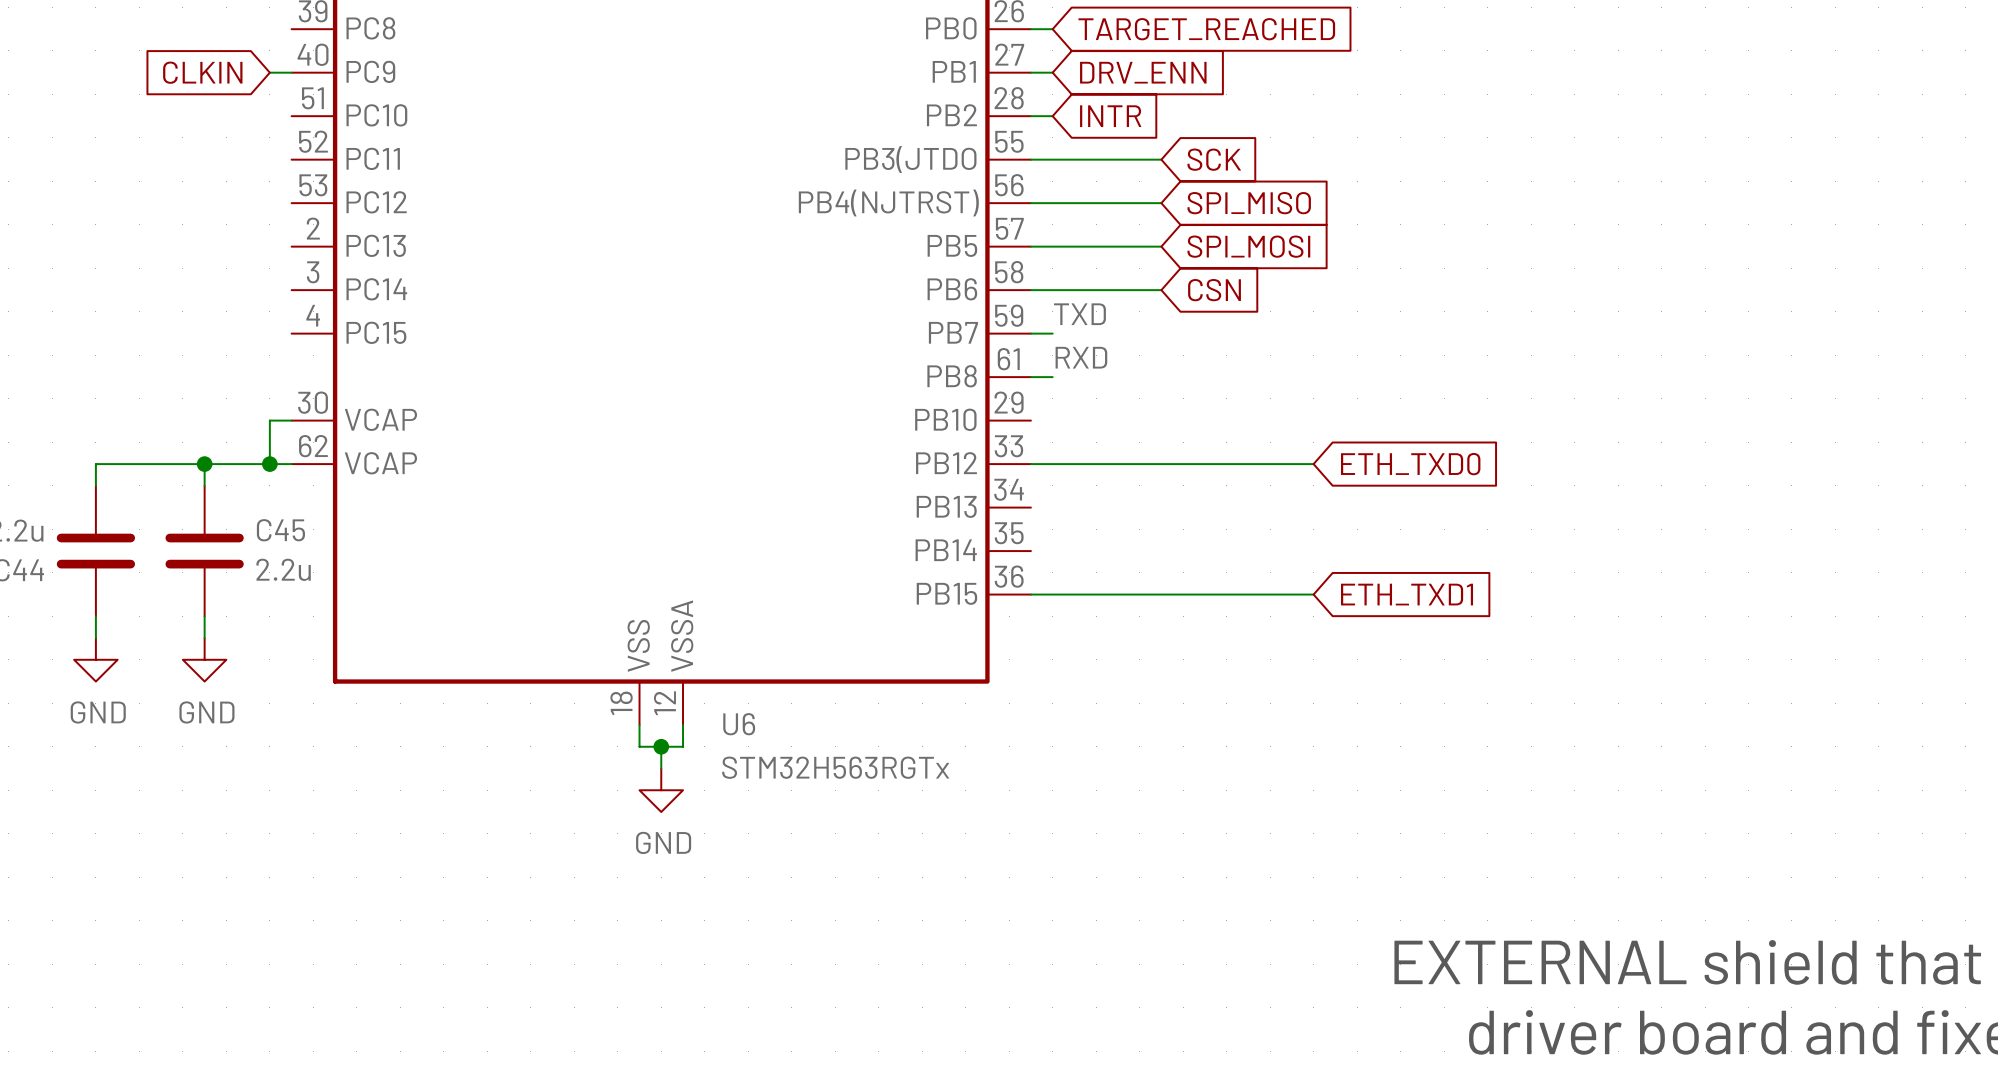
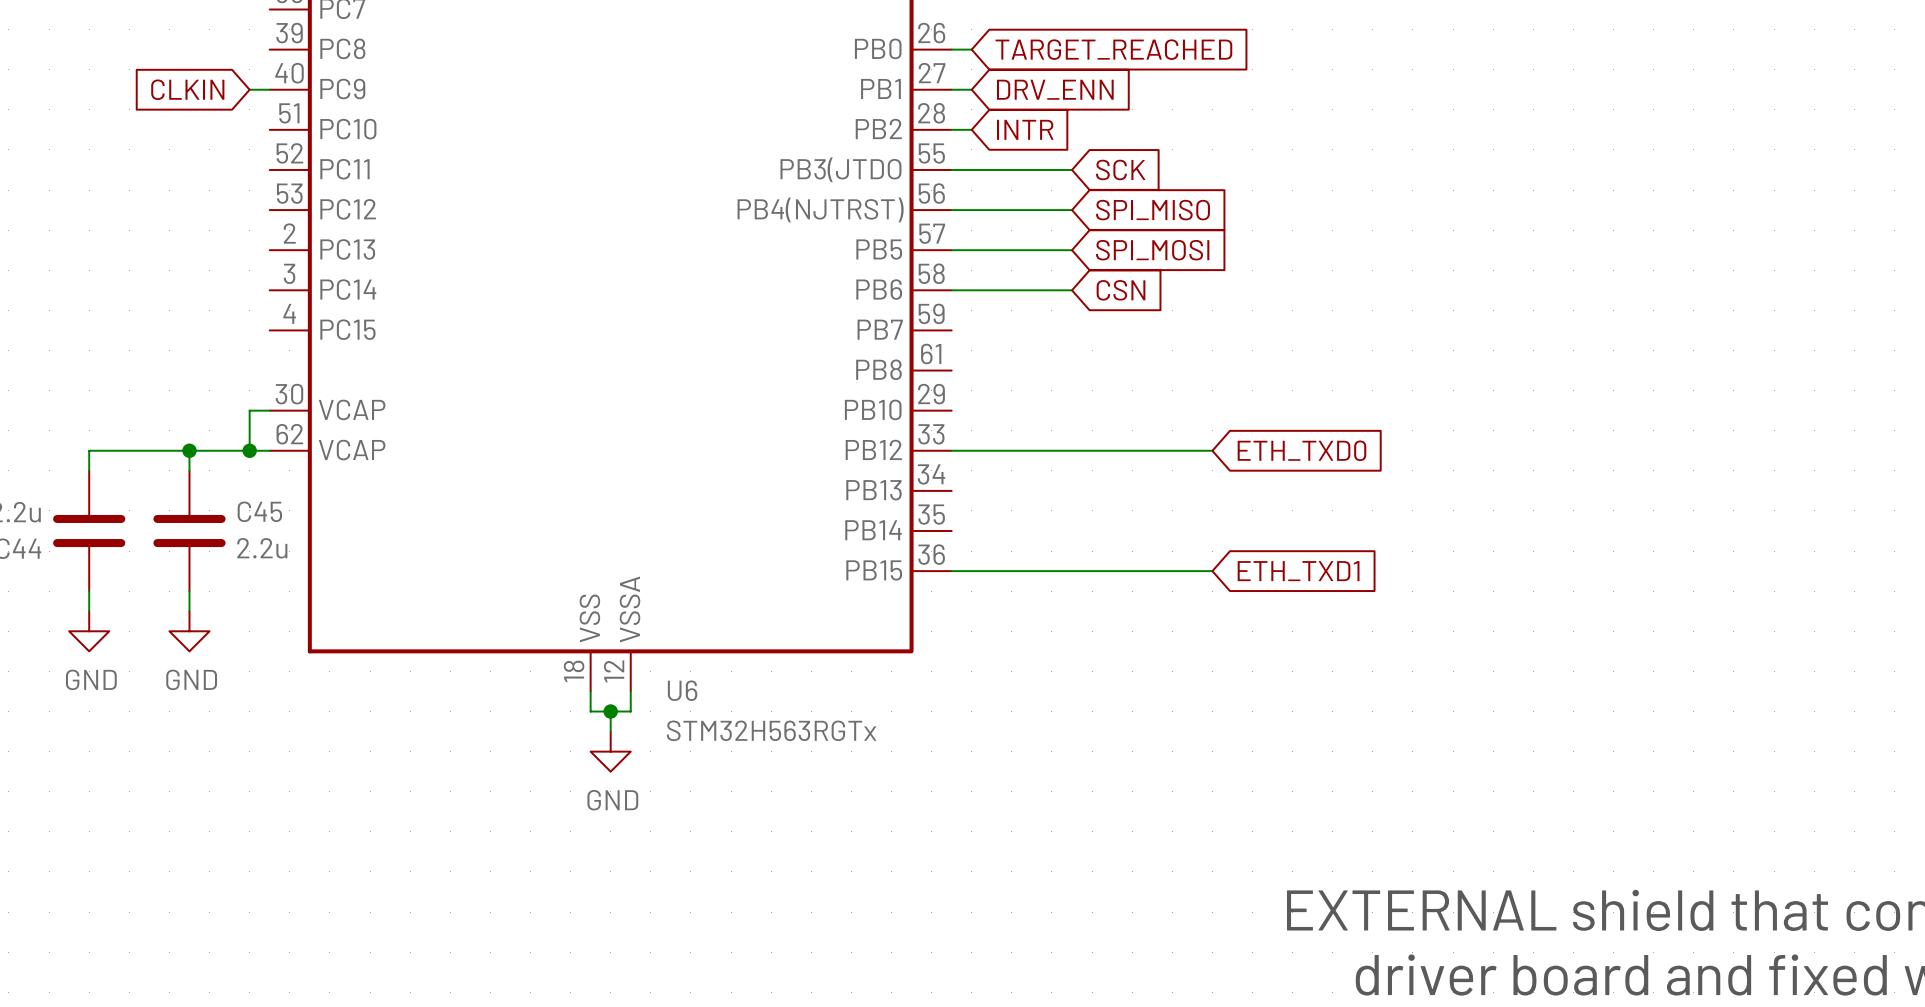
label: TXD (1079, 314) -> none
wire: (1030, 333) (1052, 333) -> none
label: RXD (1081, 357) -> none
wire: (1030, 377) (1052, 377) -> none

